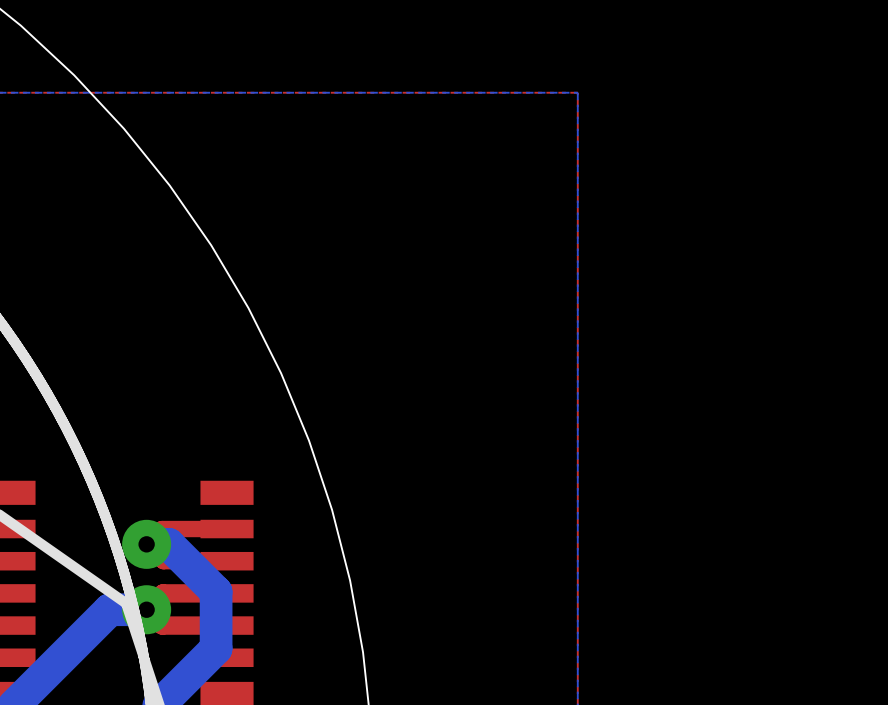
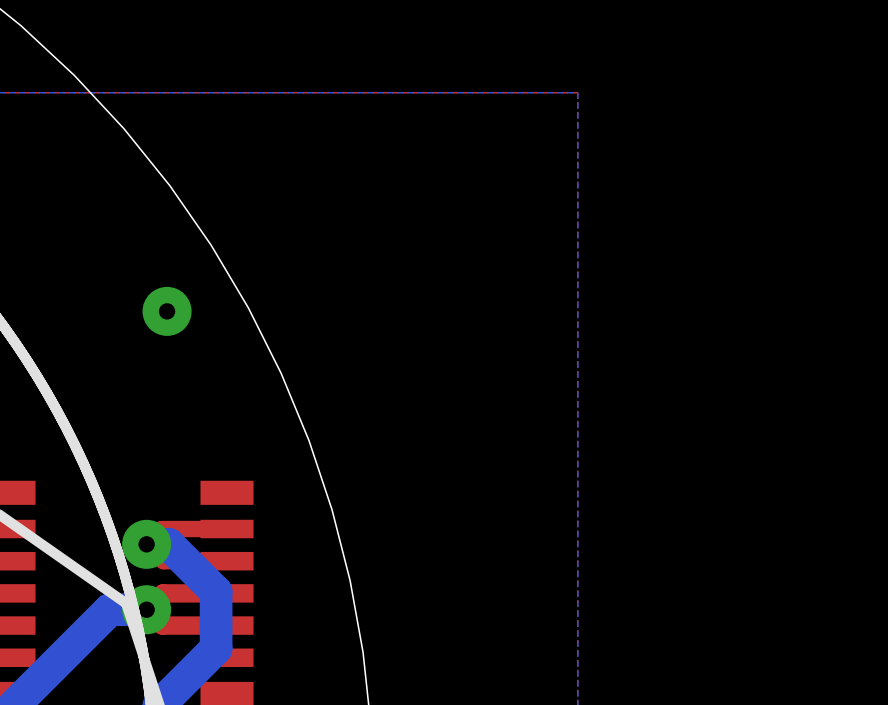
via: none -> (167, 311)

